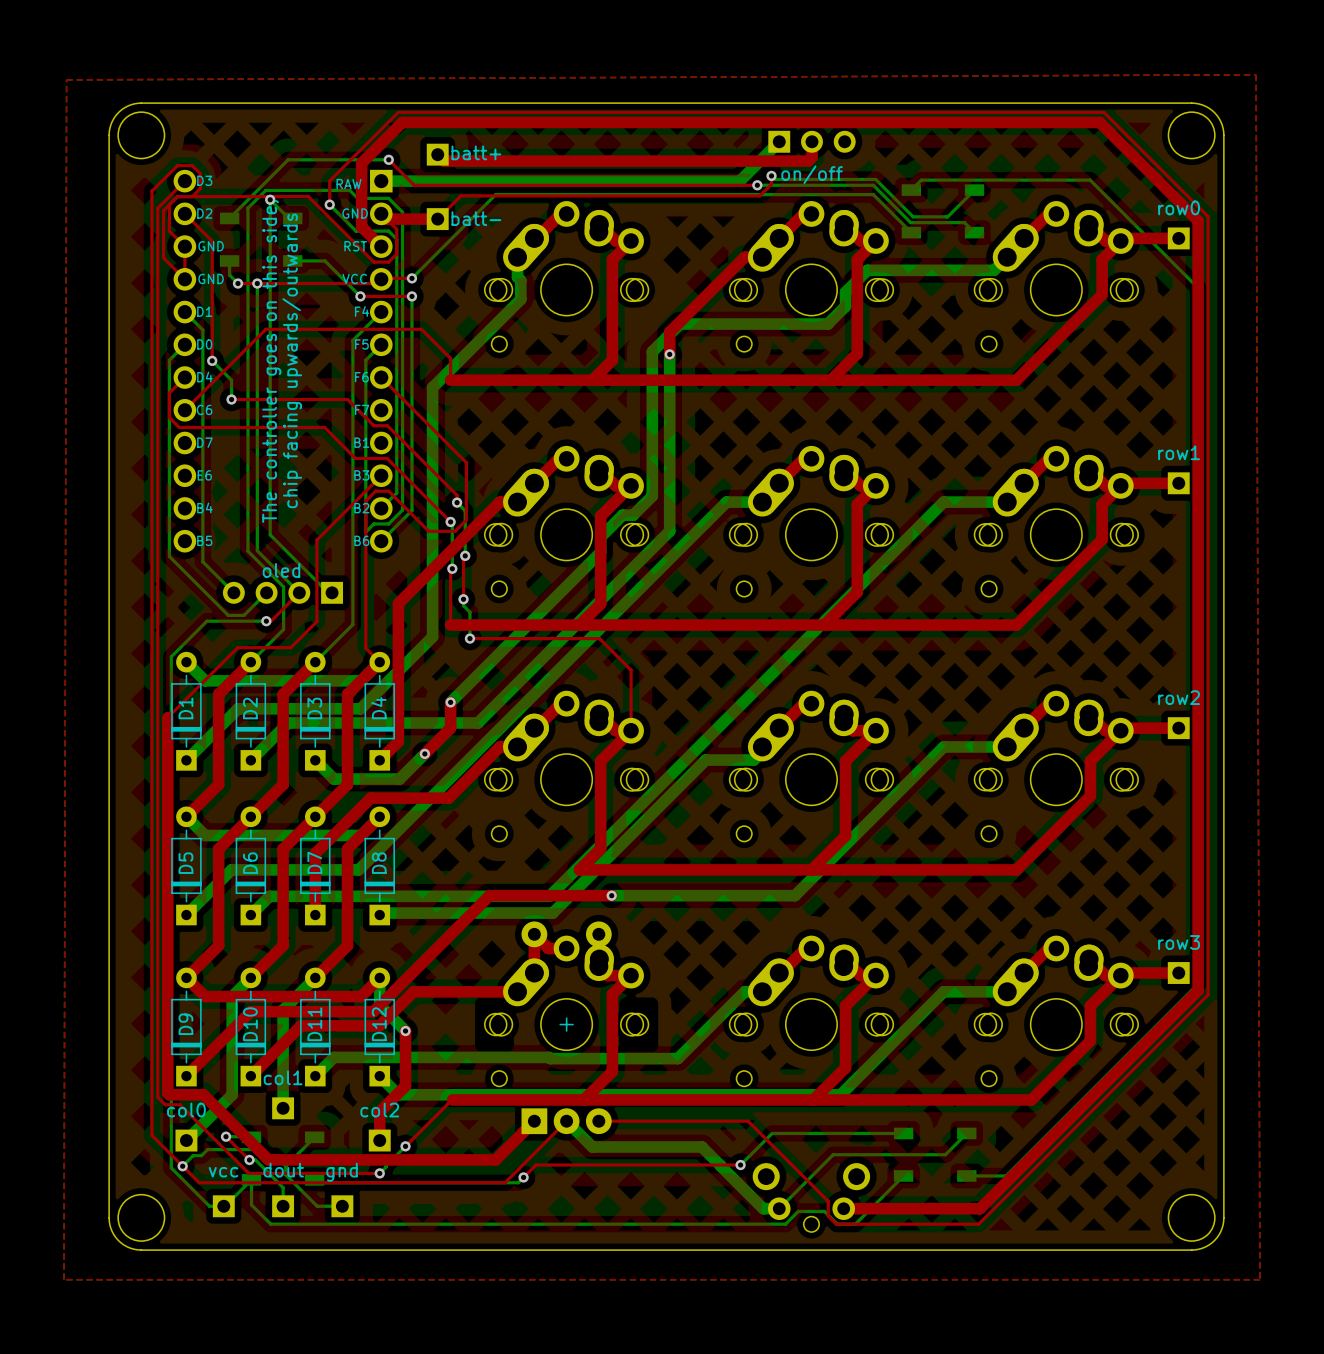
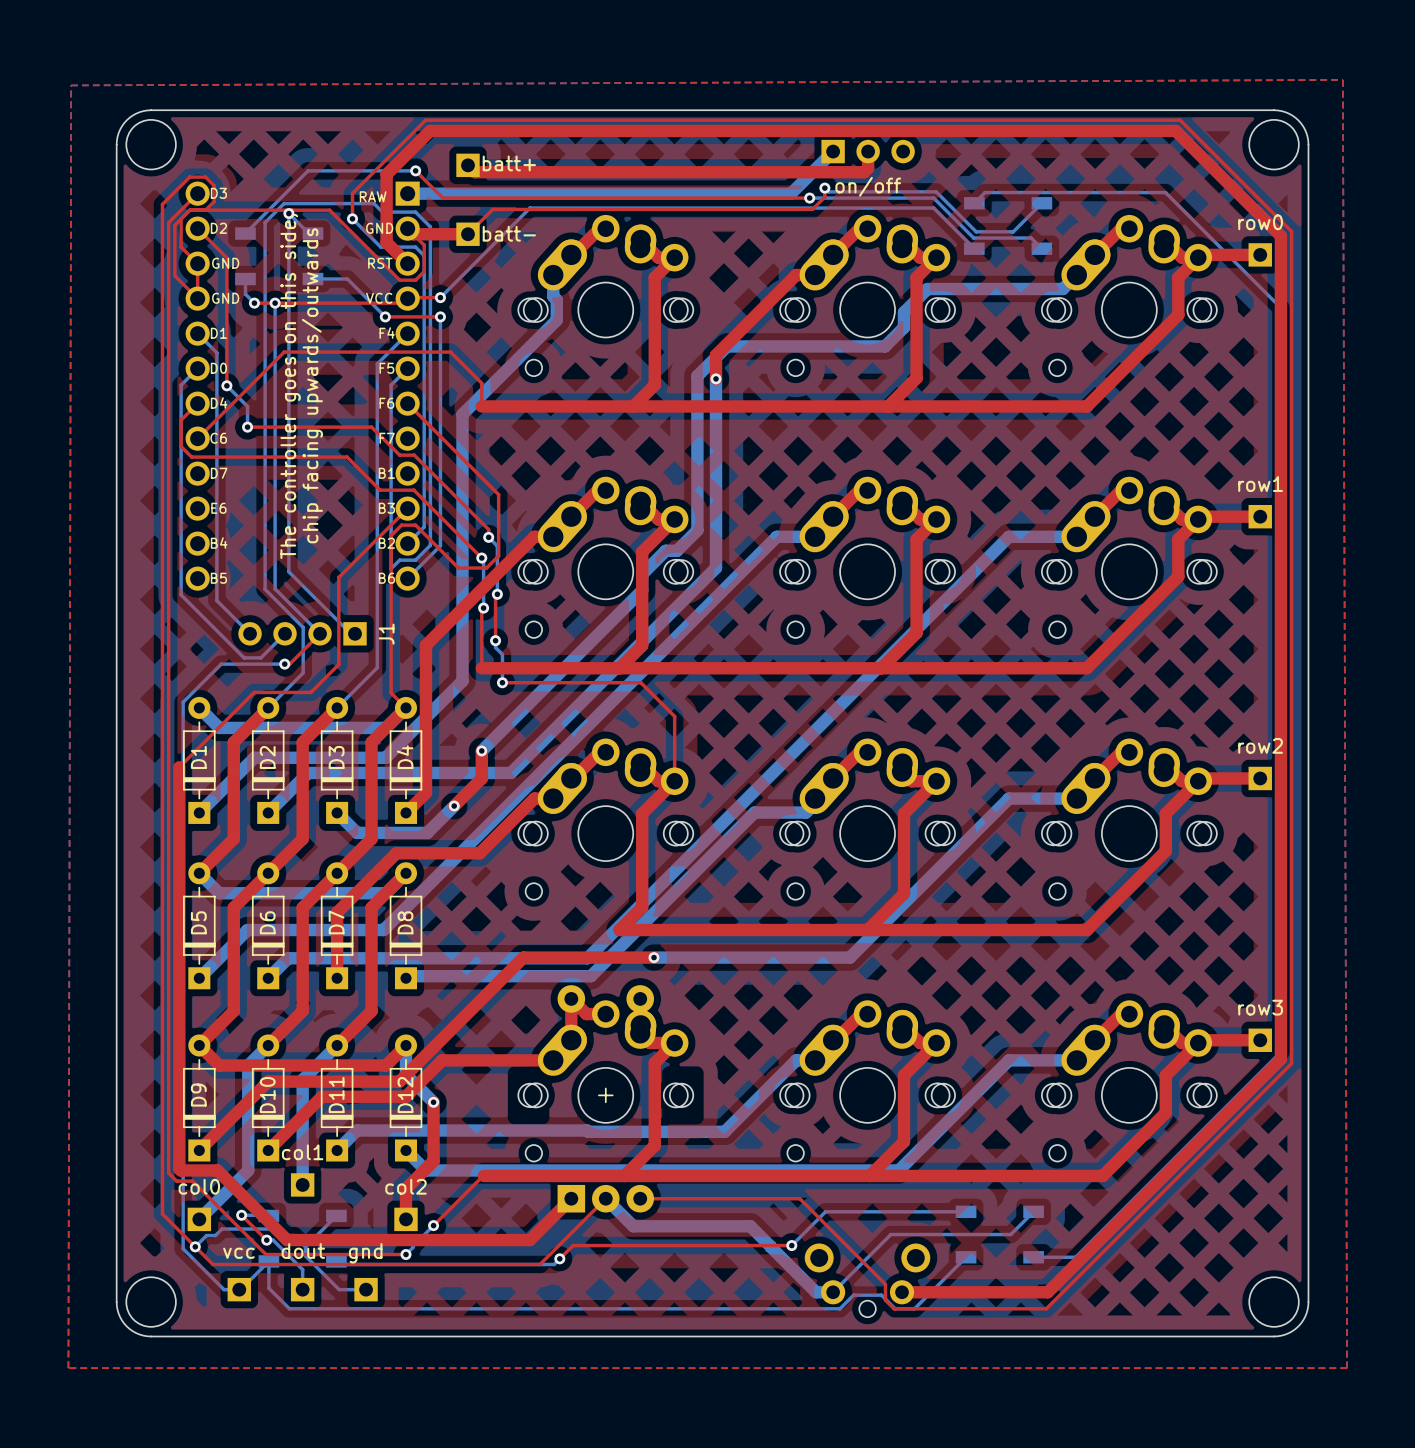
oled name: oled (281, 570) -> J1 (386, 634)

